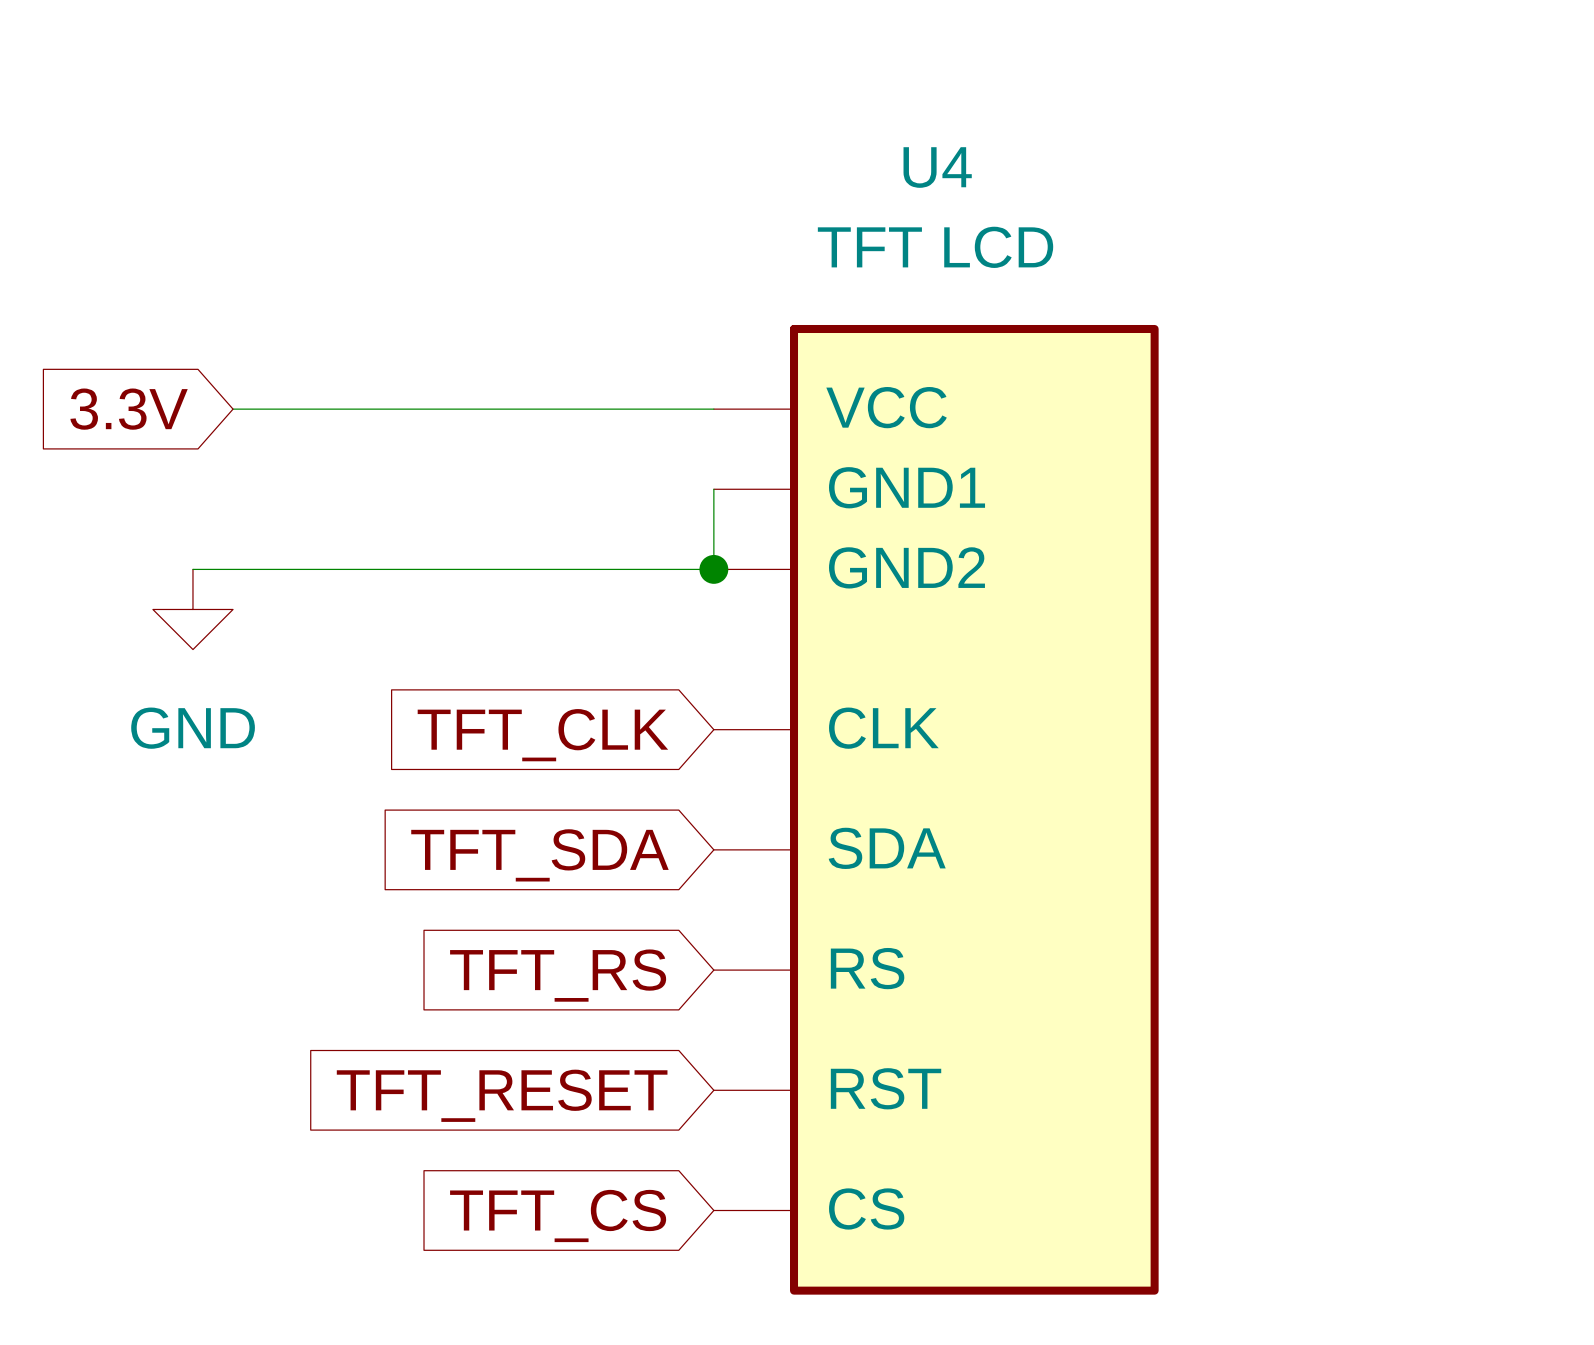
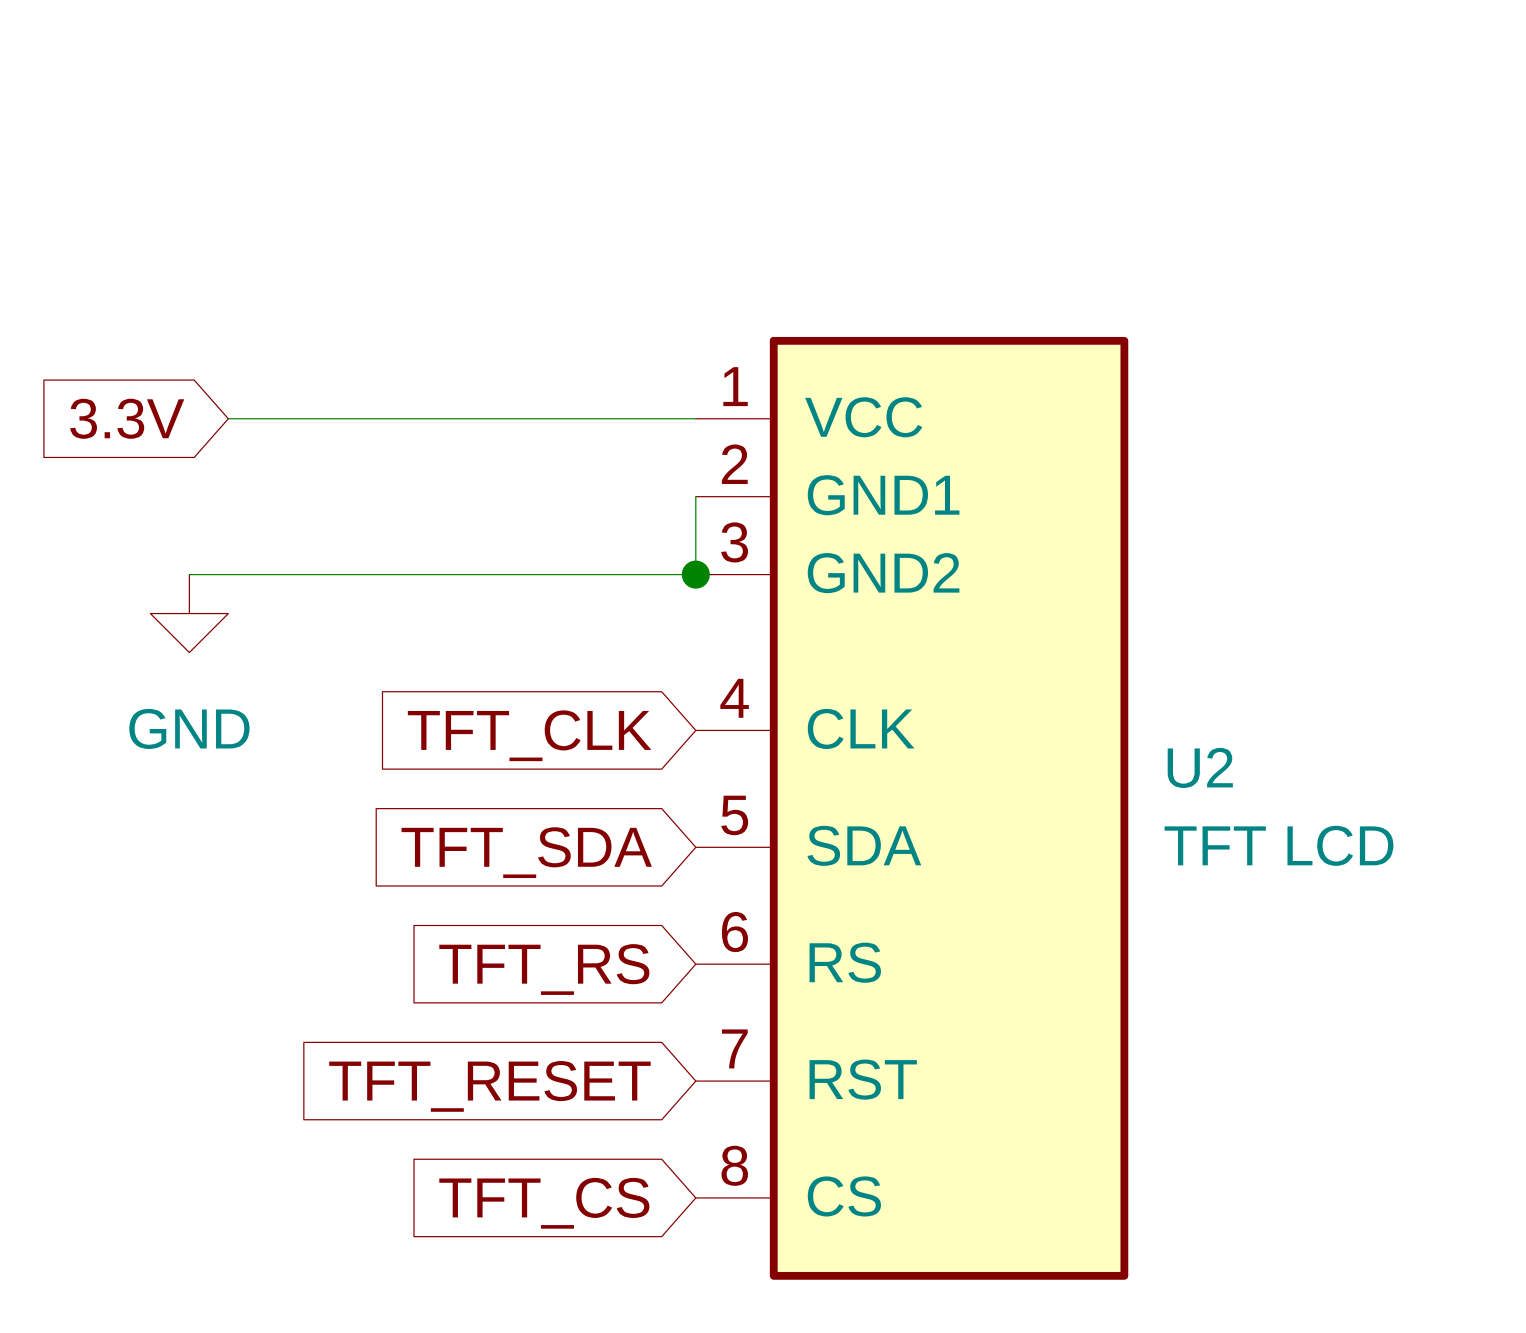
U4 name: U4 (937, 167) -> U2 (1200, 767)
U4 value position: TFT LCD (935, 247) -> TFT LCD (1279, 845)
U4 pin number: none -> 1 (735, 386)
U4 pin number: none -> 2 (734, 464)
U4 pin number: none -> 3 (734, 542)
U4 pin number: none -> 4 (734, 698)
U4 pin number: none -> 5 (734, 815)
U4 pin number: none -> 6 (734, 932)
U4 pin number: none -> 7 (734, 1048)
U4 pin number: none -> 8 (734, 1165)

